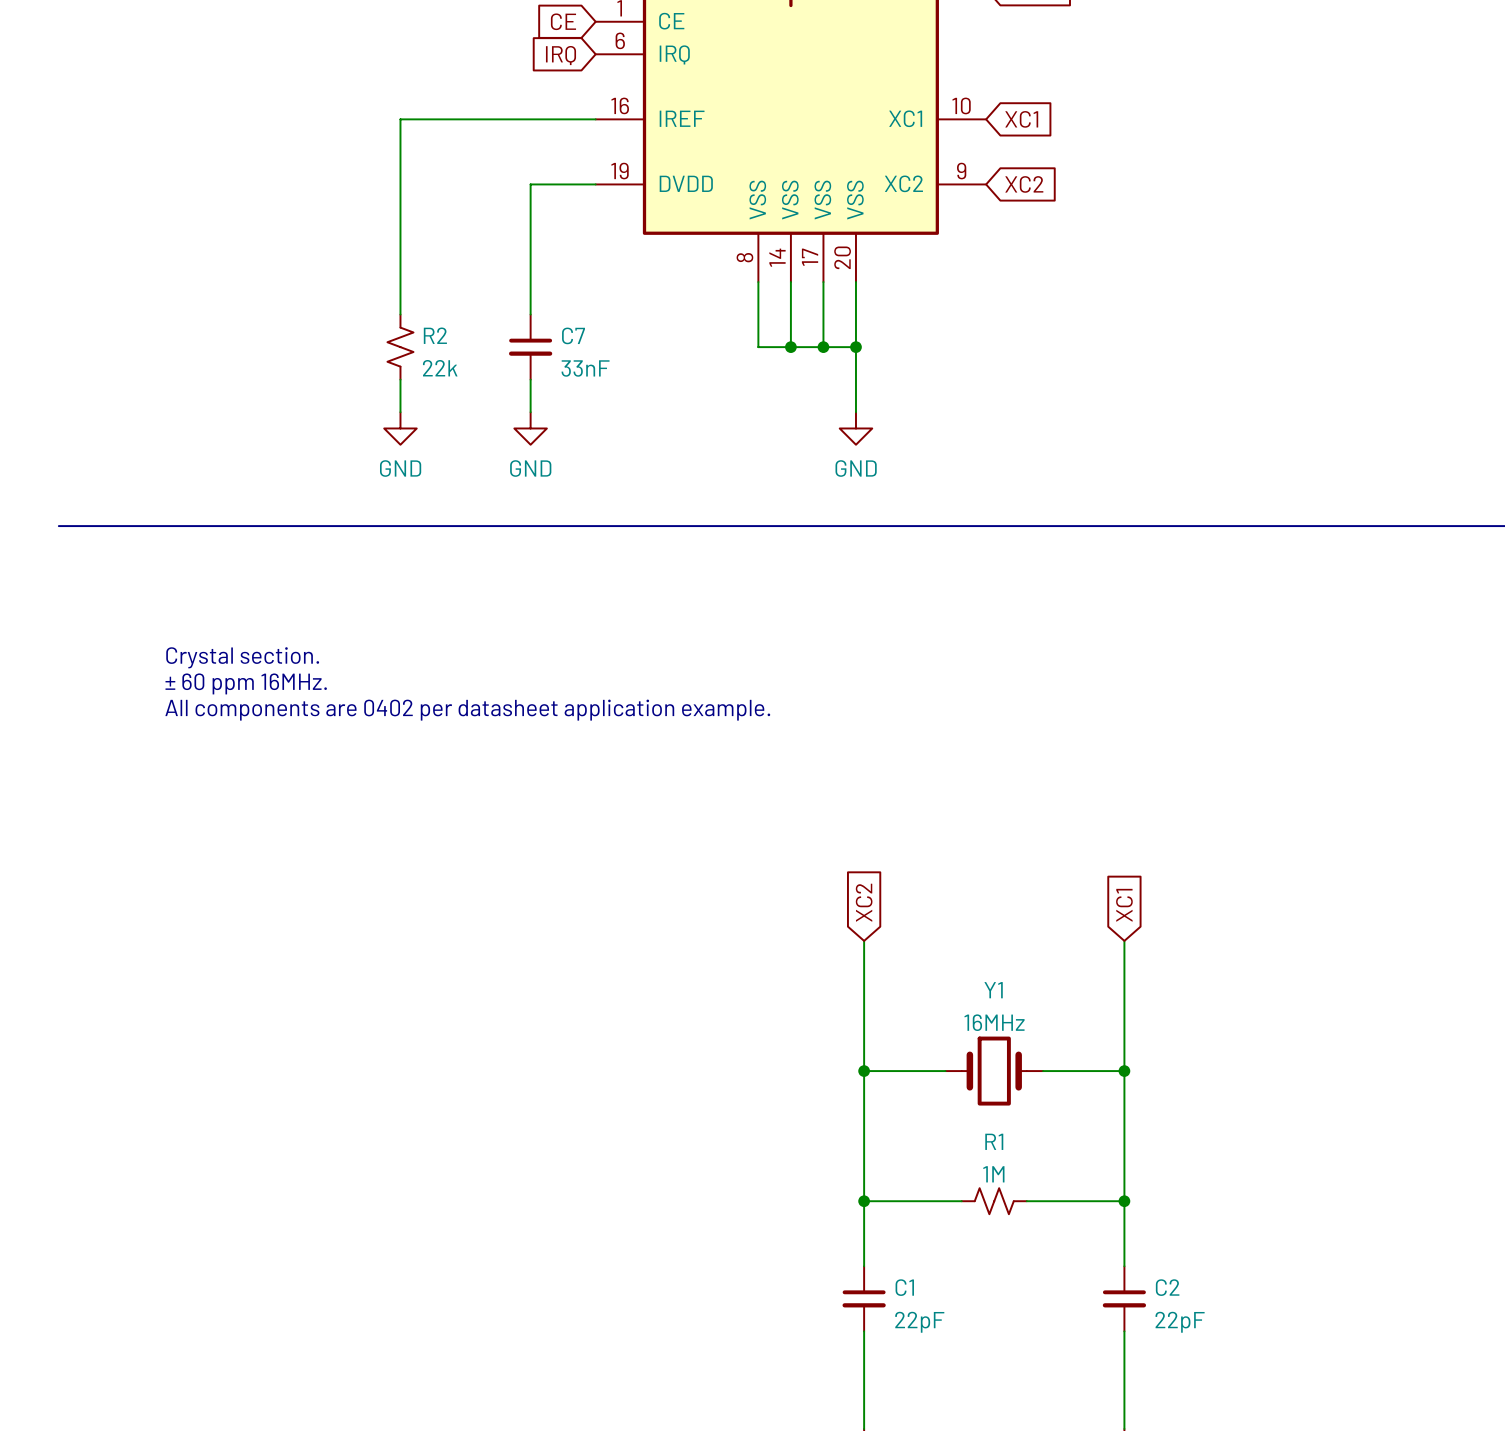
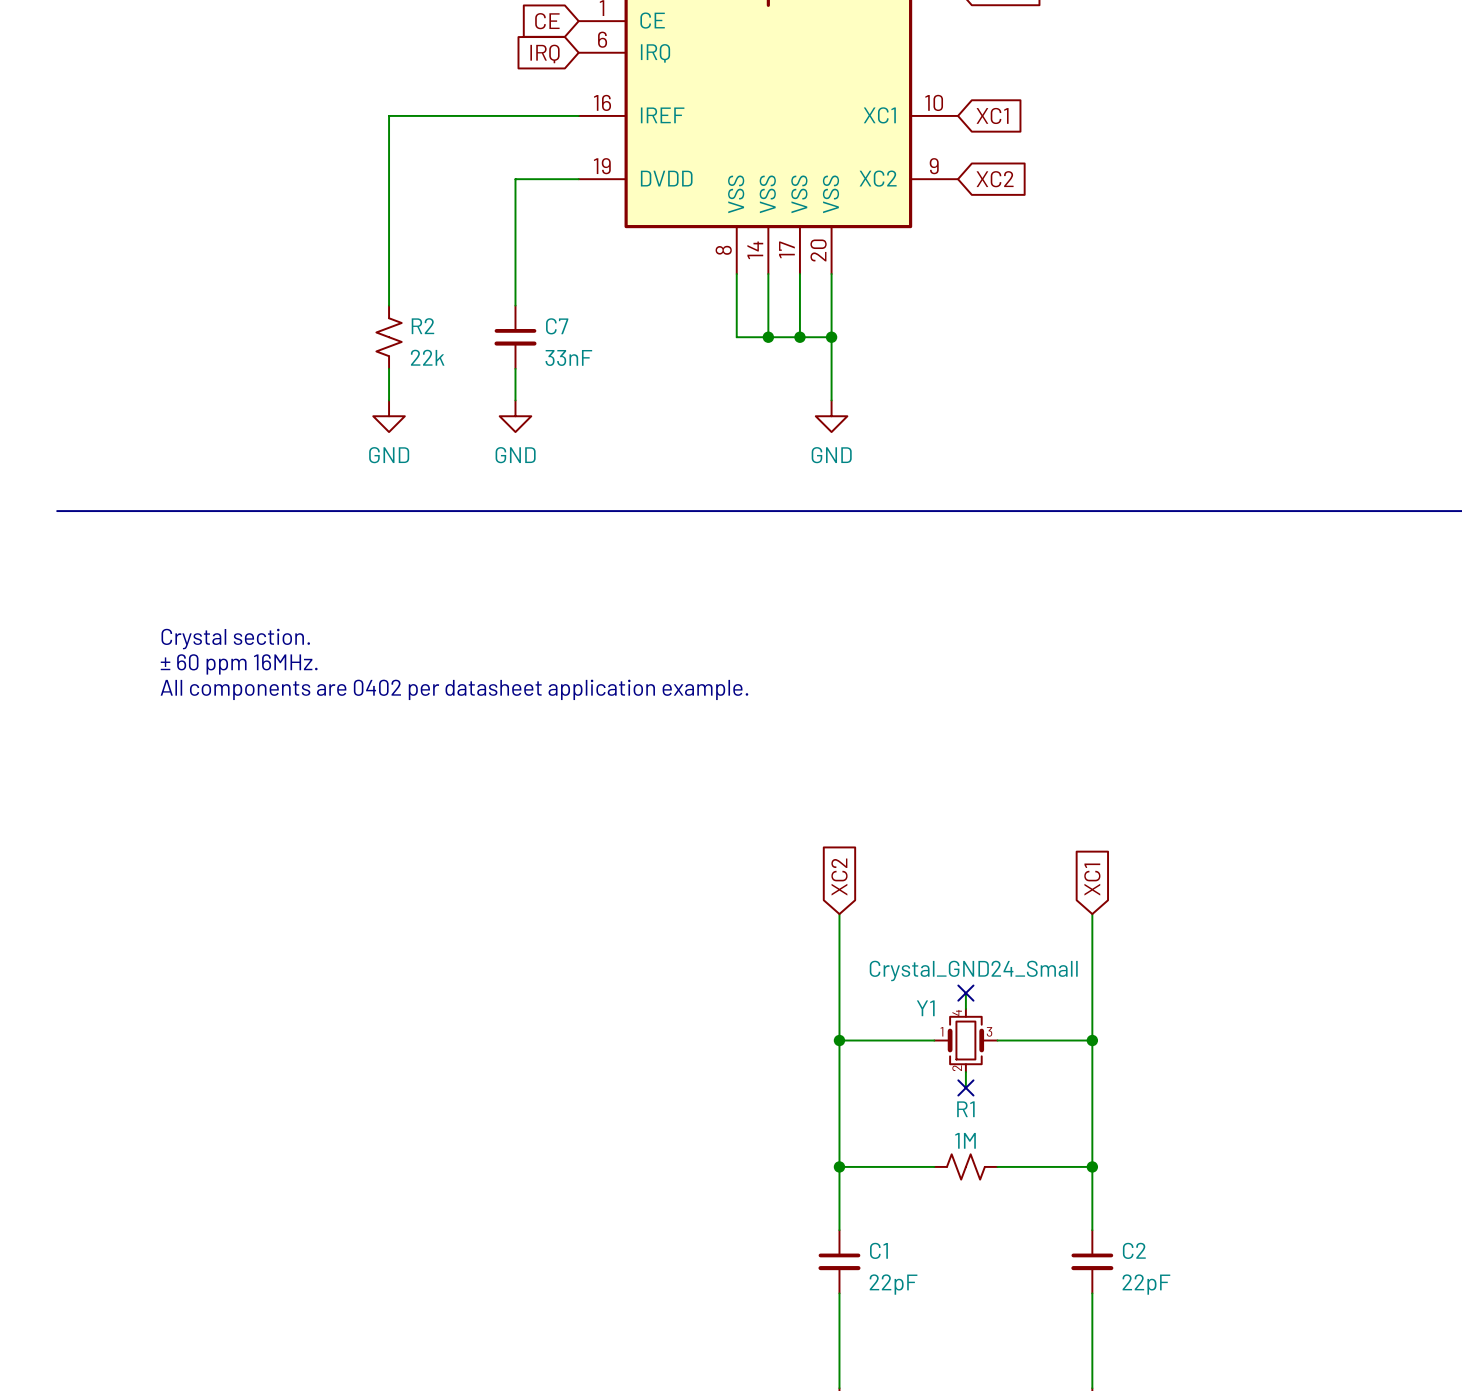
Y1 name position: Y1 (993, 990) -> Y1 (925, 1008)
wire: none -> (965, 993) (965, 1008)
Y1 value: 16MHz (994, 1022) -> Crystal_GND24_Small (973, 970)
no-connect mark: none -> (965, 993)
Y1 symbol: [945, 1036, 1044, 1106] -> [934, 1008, 998, 1073]
wire: none -> (965, 1072) (965, 1087)
no-connect mark: none -> (965, 1087)

